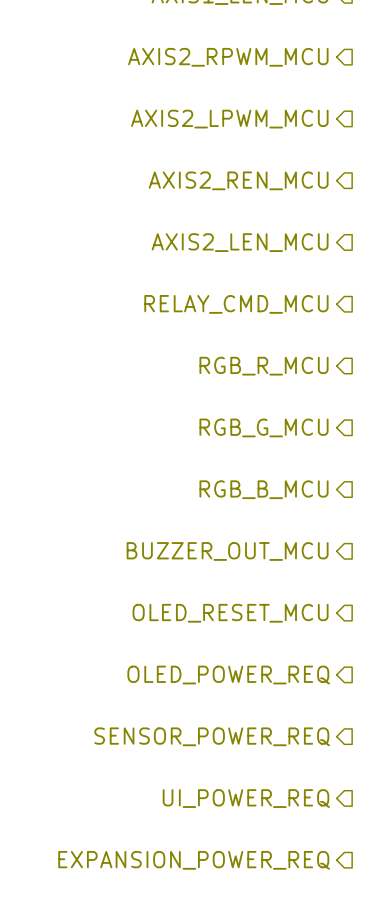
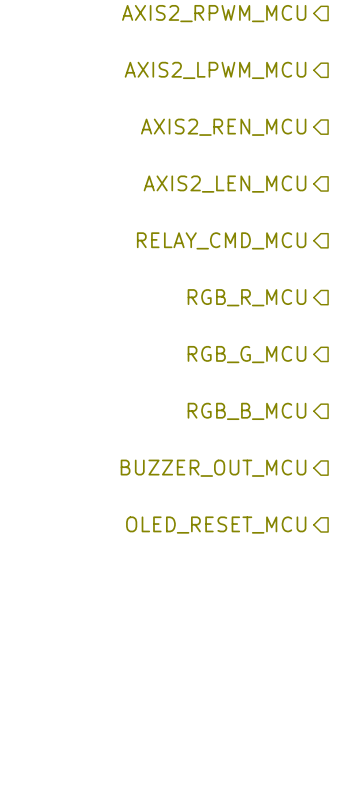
hierarchical label: OLED_POWER_REQ (228, 675) -> none
hierarchical label: SENSOR_POWER_REQ (212, 736) -> none
hierarchical label: UI_POWER_REQ (246, 798) -> none
hierarchical label: EXPANSION_POWER_REQ (194, 860) -> none

